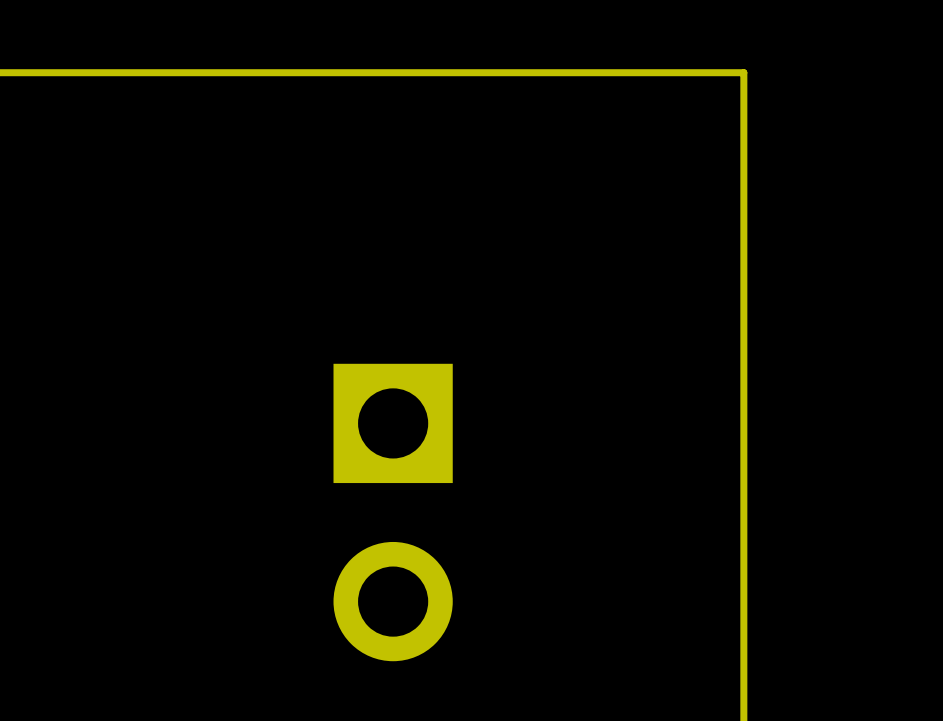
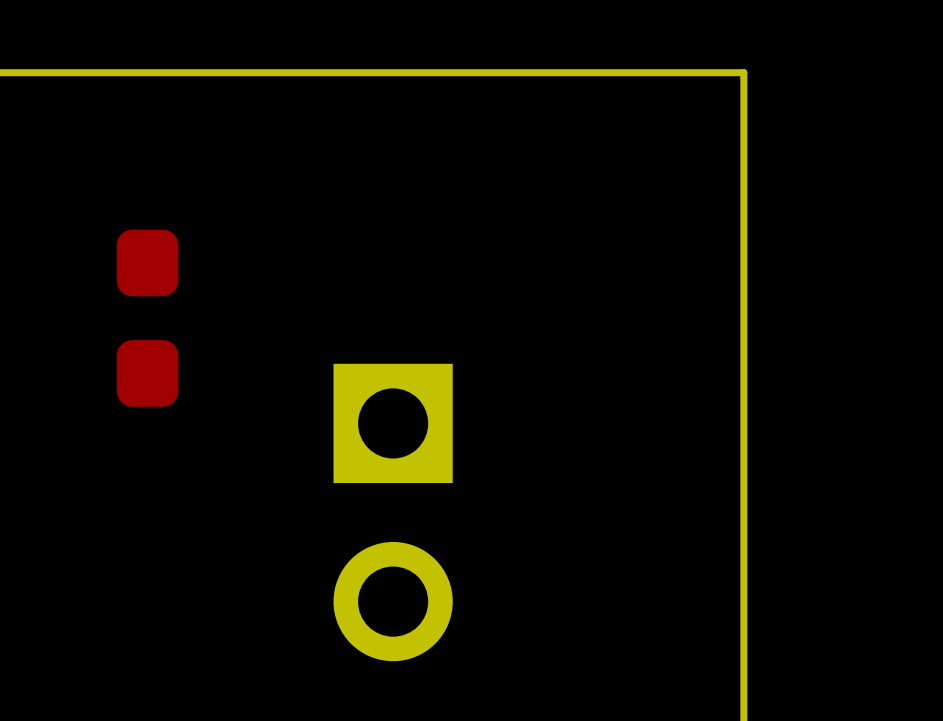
part: none -> (147, 318)

